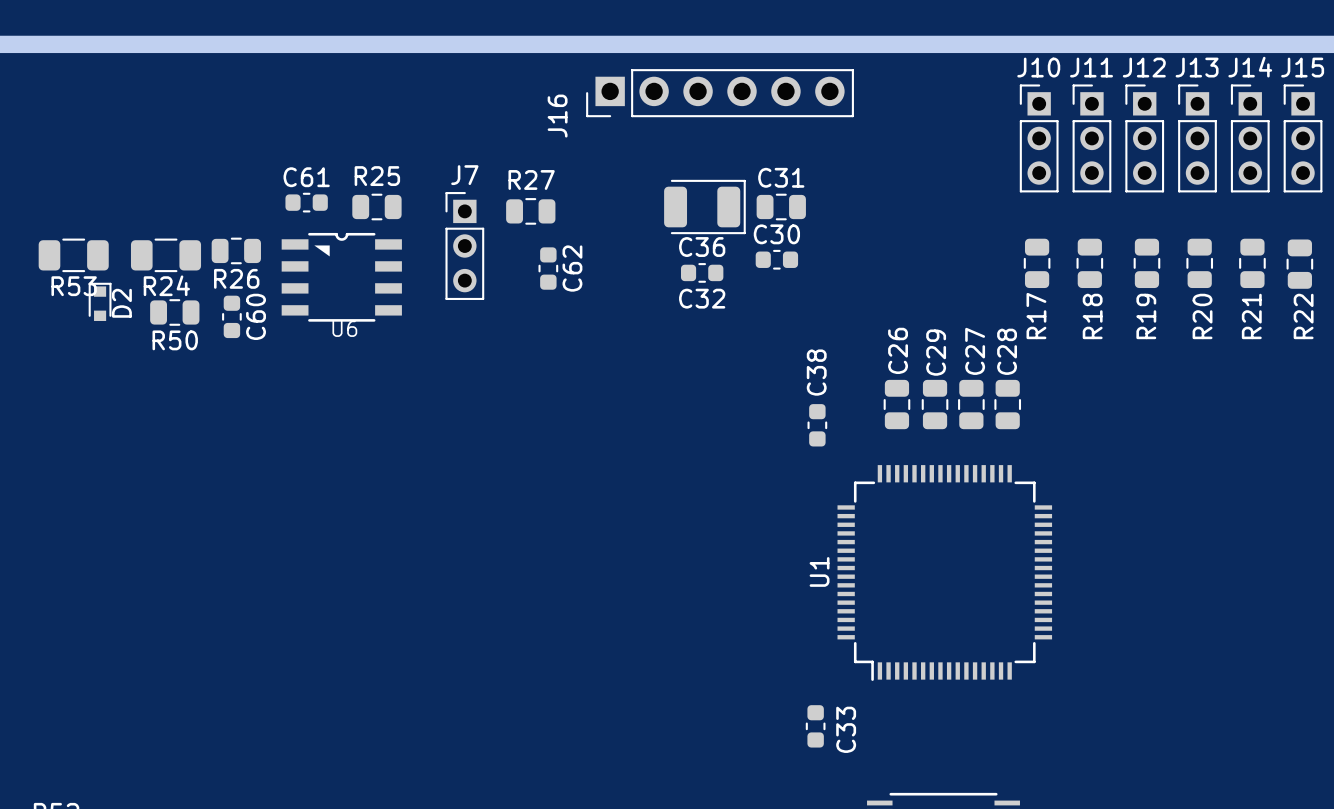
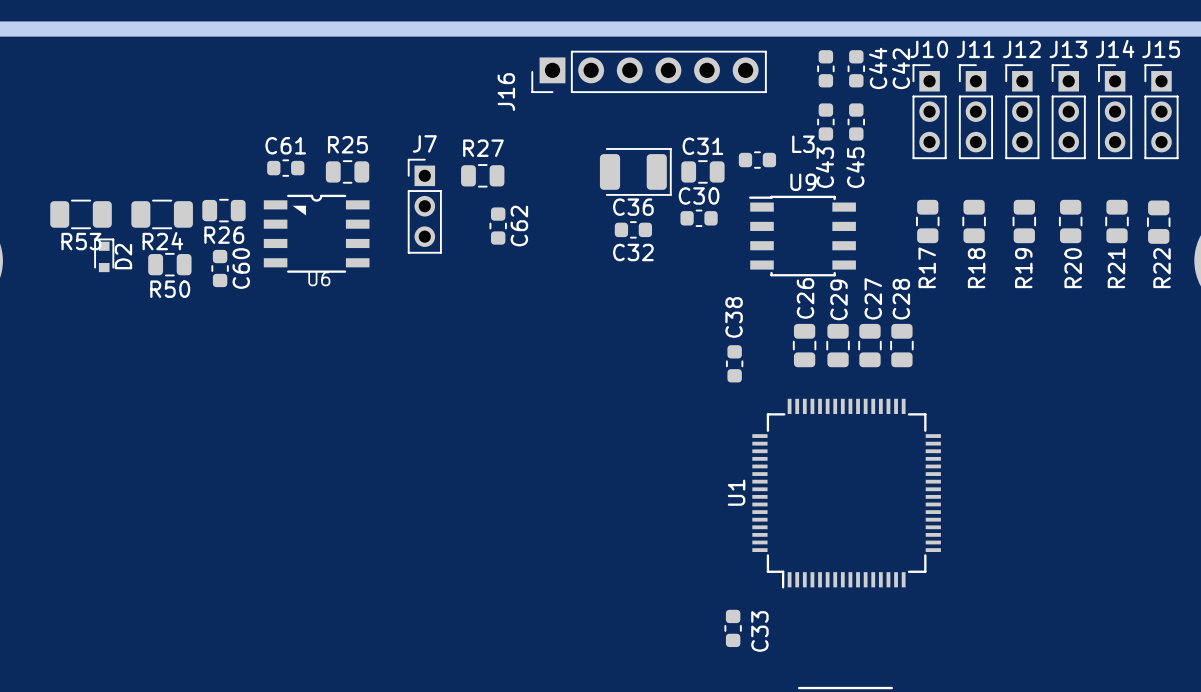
C44: none -> (825, 68)
C42: none -> (856, 68)
C43: none -> (825, 122)
C45: none -> (856, 122)
L3: none -> (757, 160)
U9: none -> (802, 236)

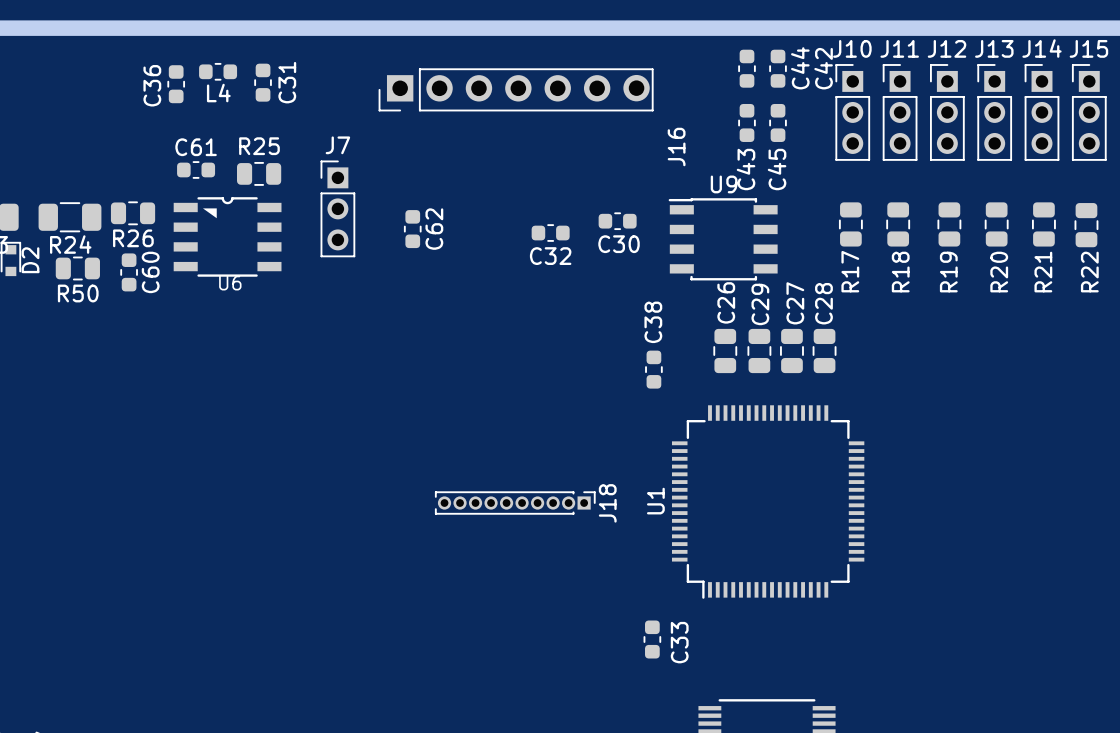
J16 footprint: [531, 50, 767, 94] -> [378, 68, 654, 112]
L4: none -> (218, 71)
J16 name position: J16 (506, 92) -> J16 (676, 147)
C31 name position: C31 (702, 146) -> C31 (287, 82)
C36 footprint: [599, 148, 672, 196] -> [167, 65, 186, 104]
C31 footprint: [681, 160, 725, 184] -> [254, 63, 272, 102]
L3: (757, 160) -> none
R27: (482, 175) -> none
C30 name position: C30 (699, 195) -> C30 (619, 244)
C36 name position: C36 (633, 207) -> C36 (152, 85)
J18: none -> (515, 503)

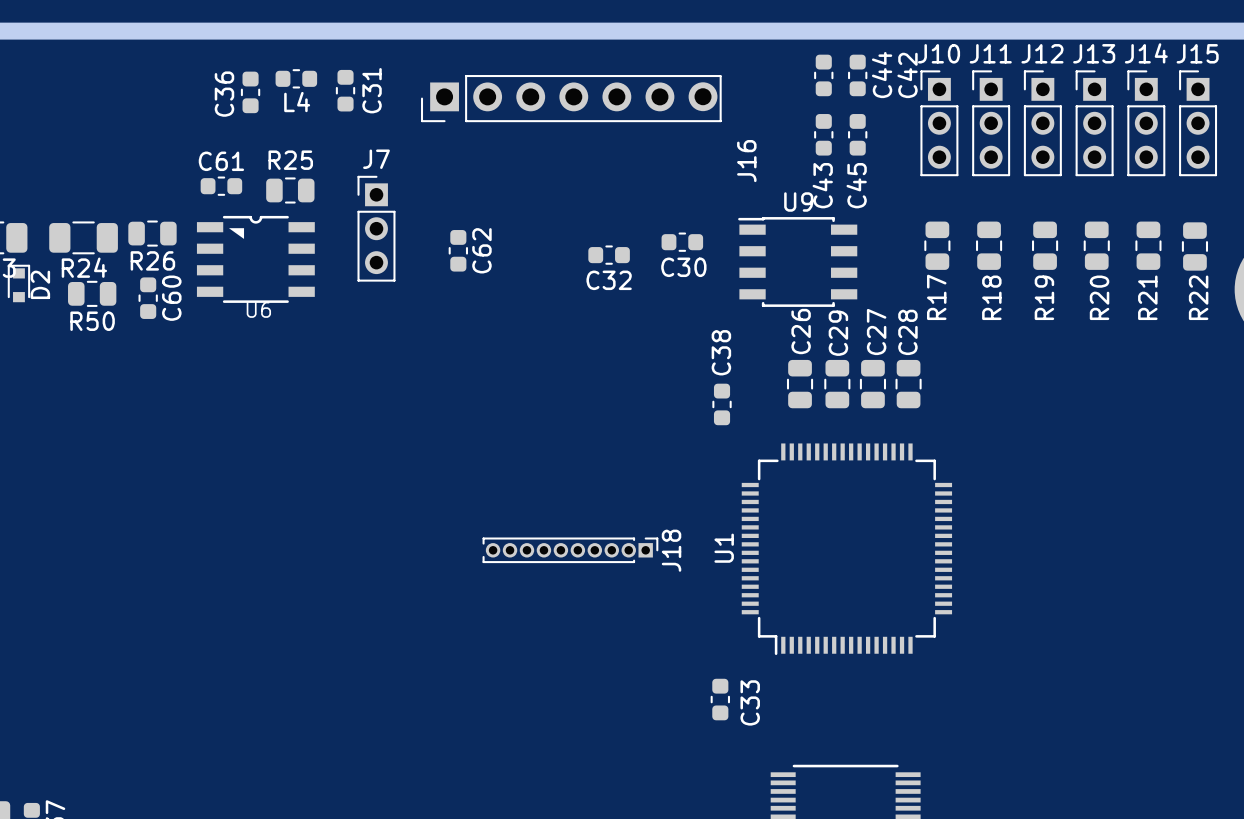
L4 position: (218, 71) -> (296, 78)
C31 position: (263, 82) -> (345, 90)
C36 position: (176, 84) -> (250, 92)

